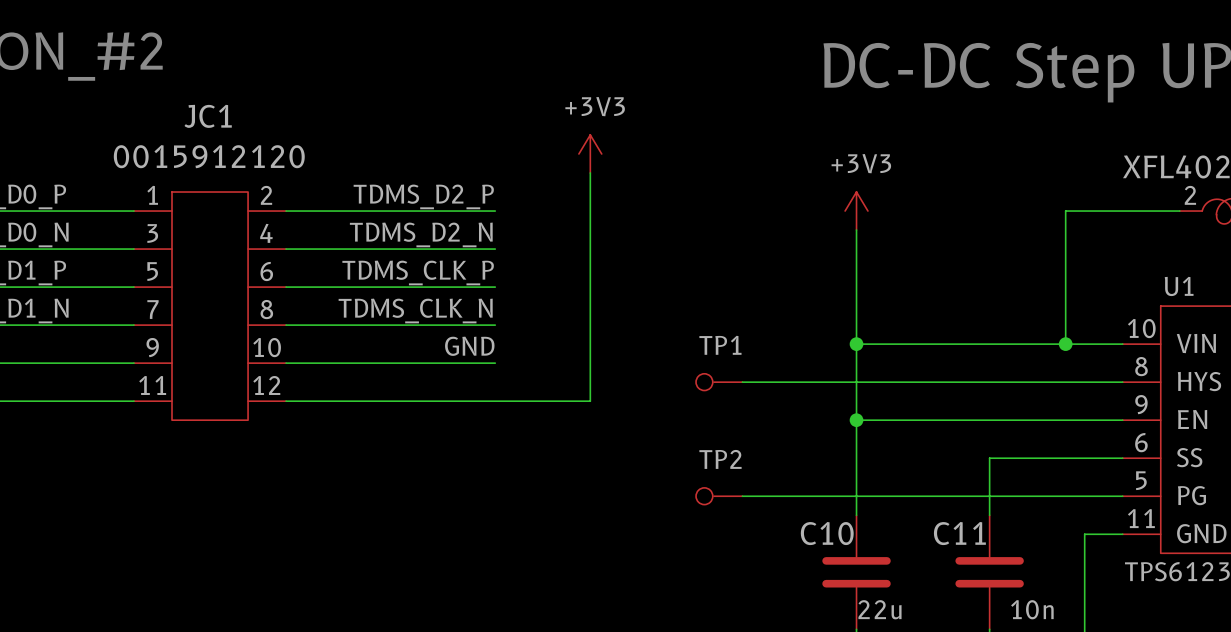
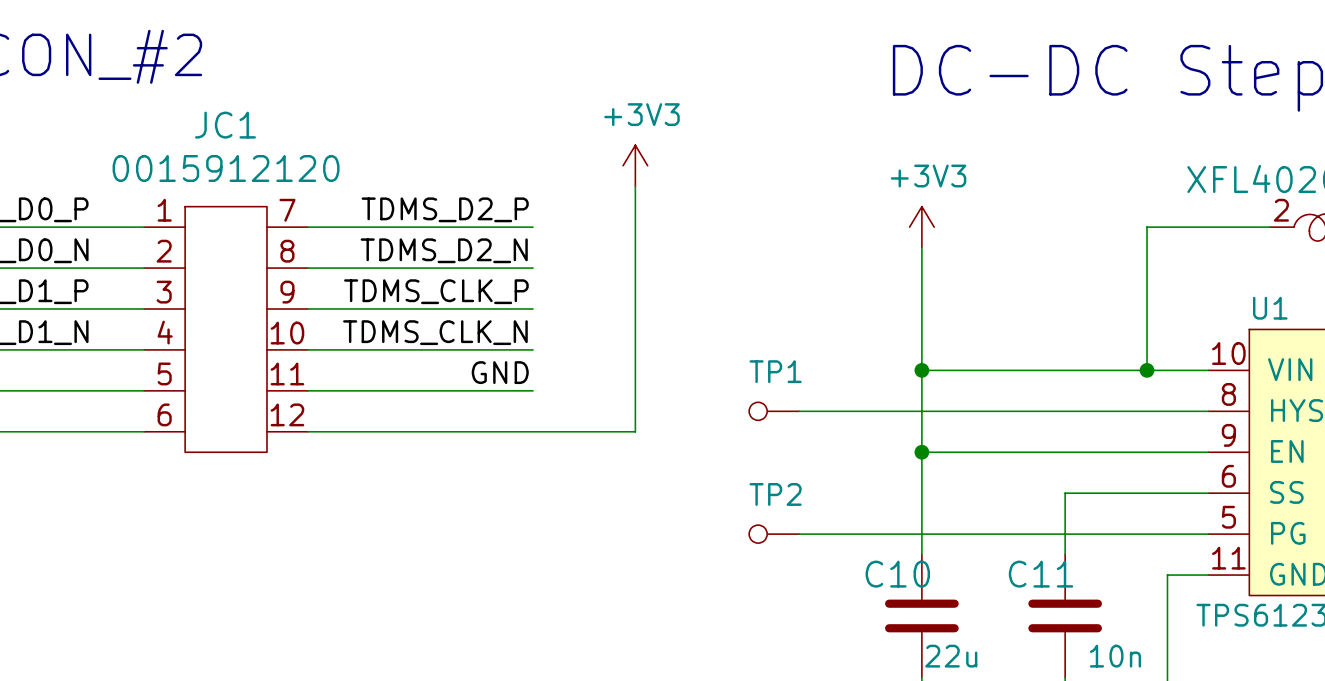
JC1 symbol: [133, 192, 287, 421] -> [144, 206, 308, 453]

